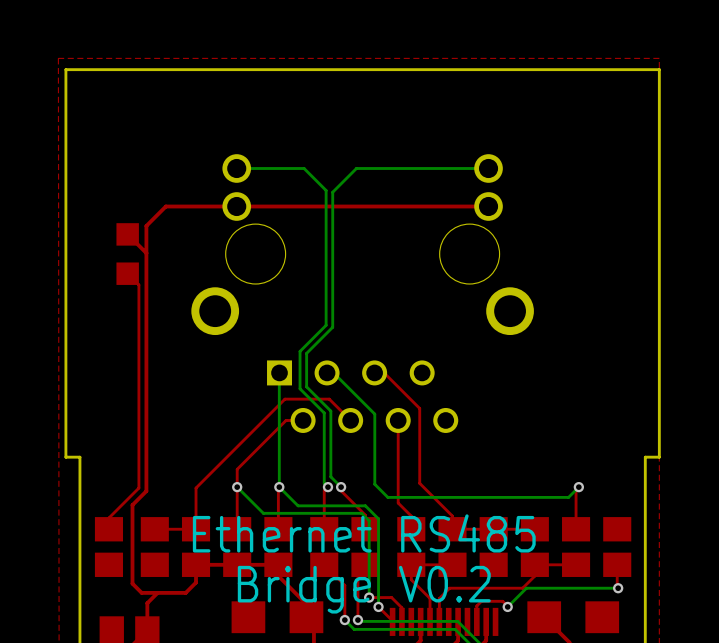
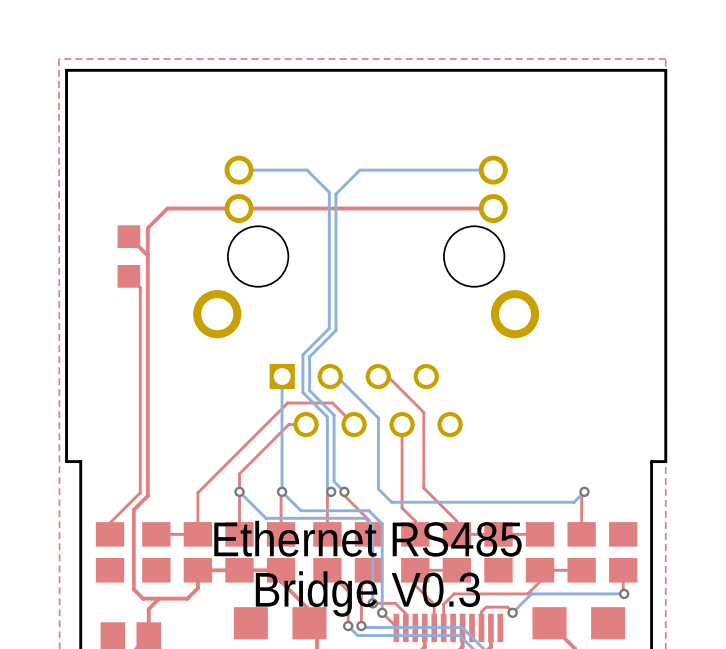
text: Bridge V0.2 (364, 589) -> Bridge V0.3 (367, 594)

